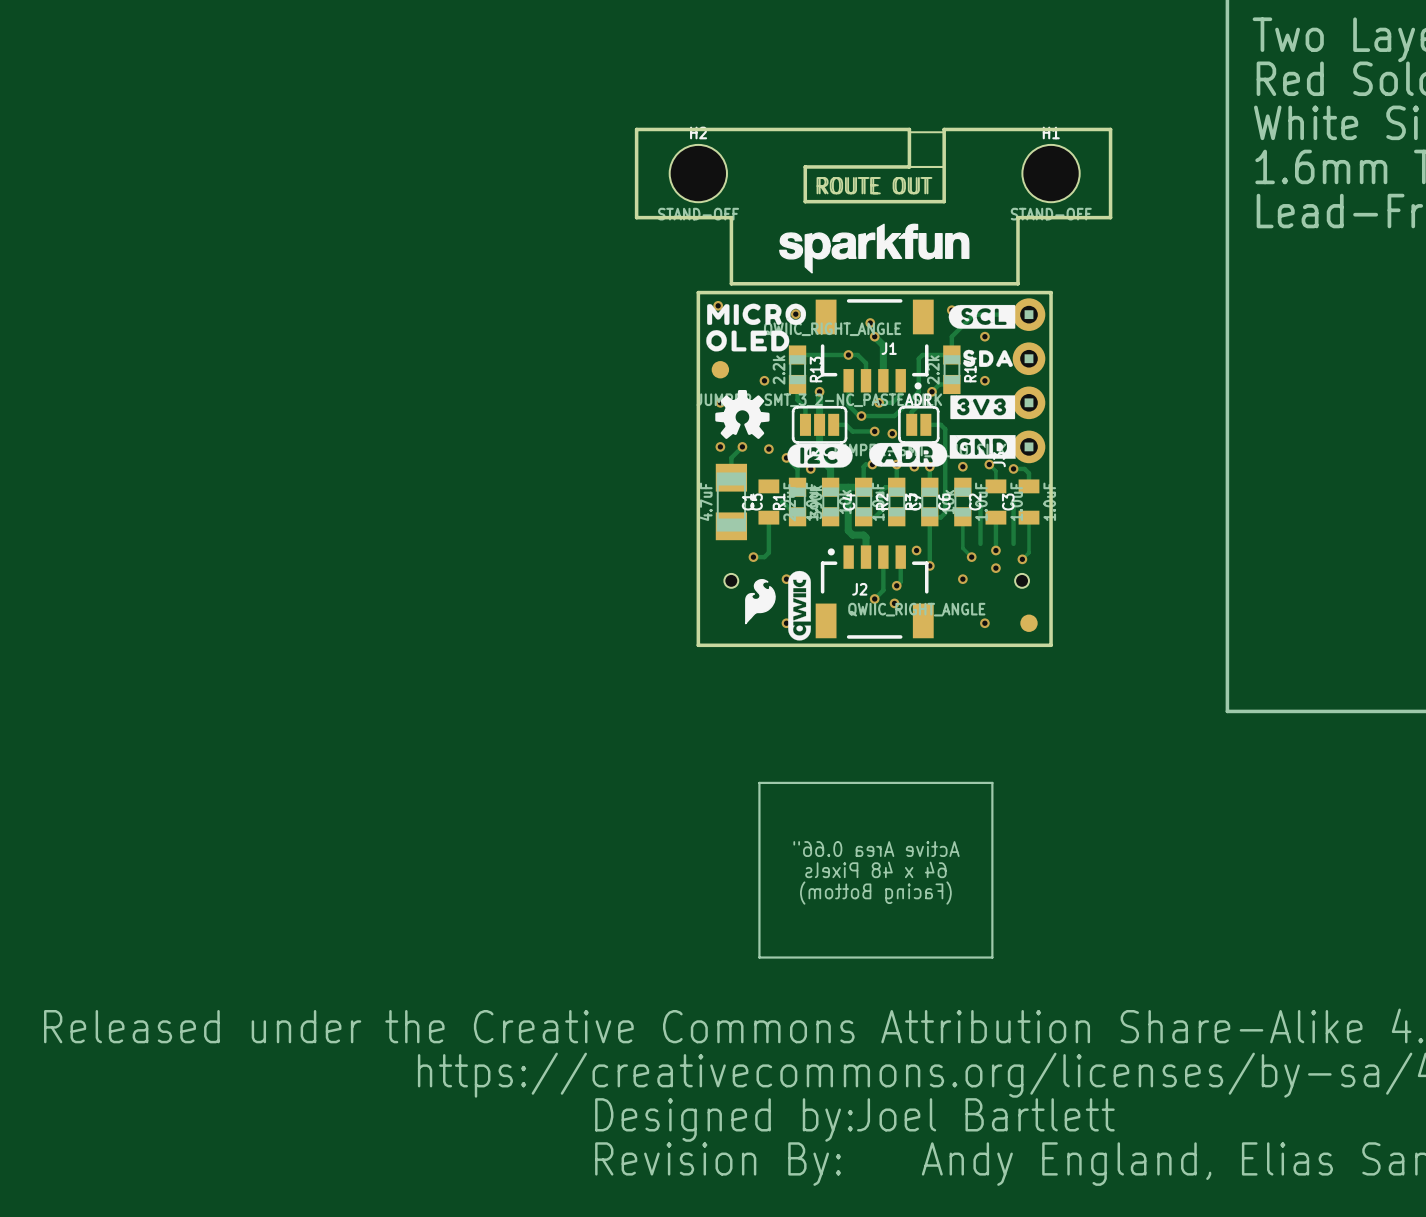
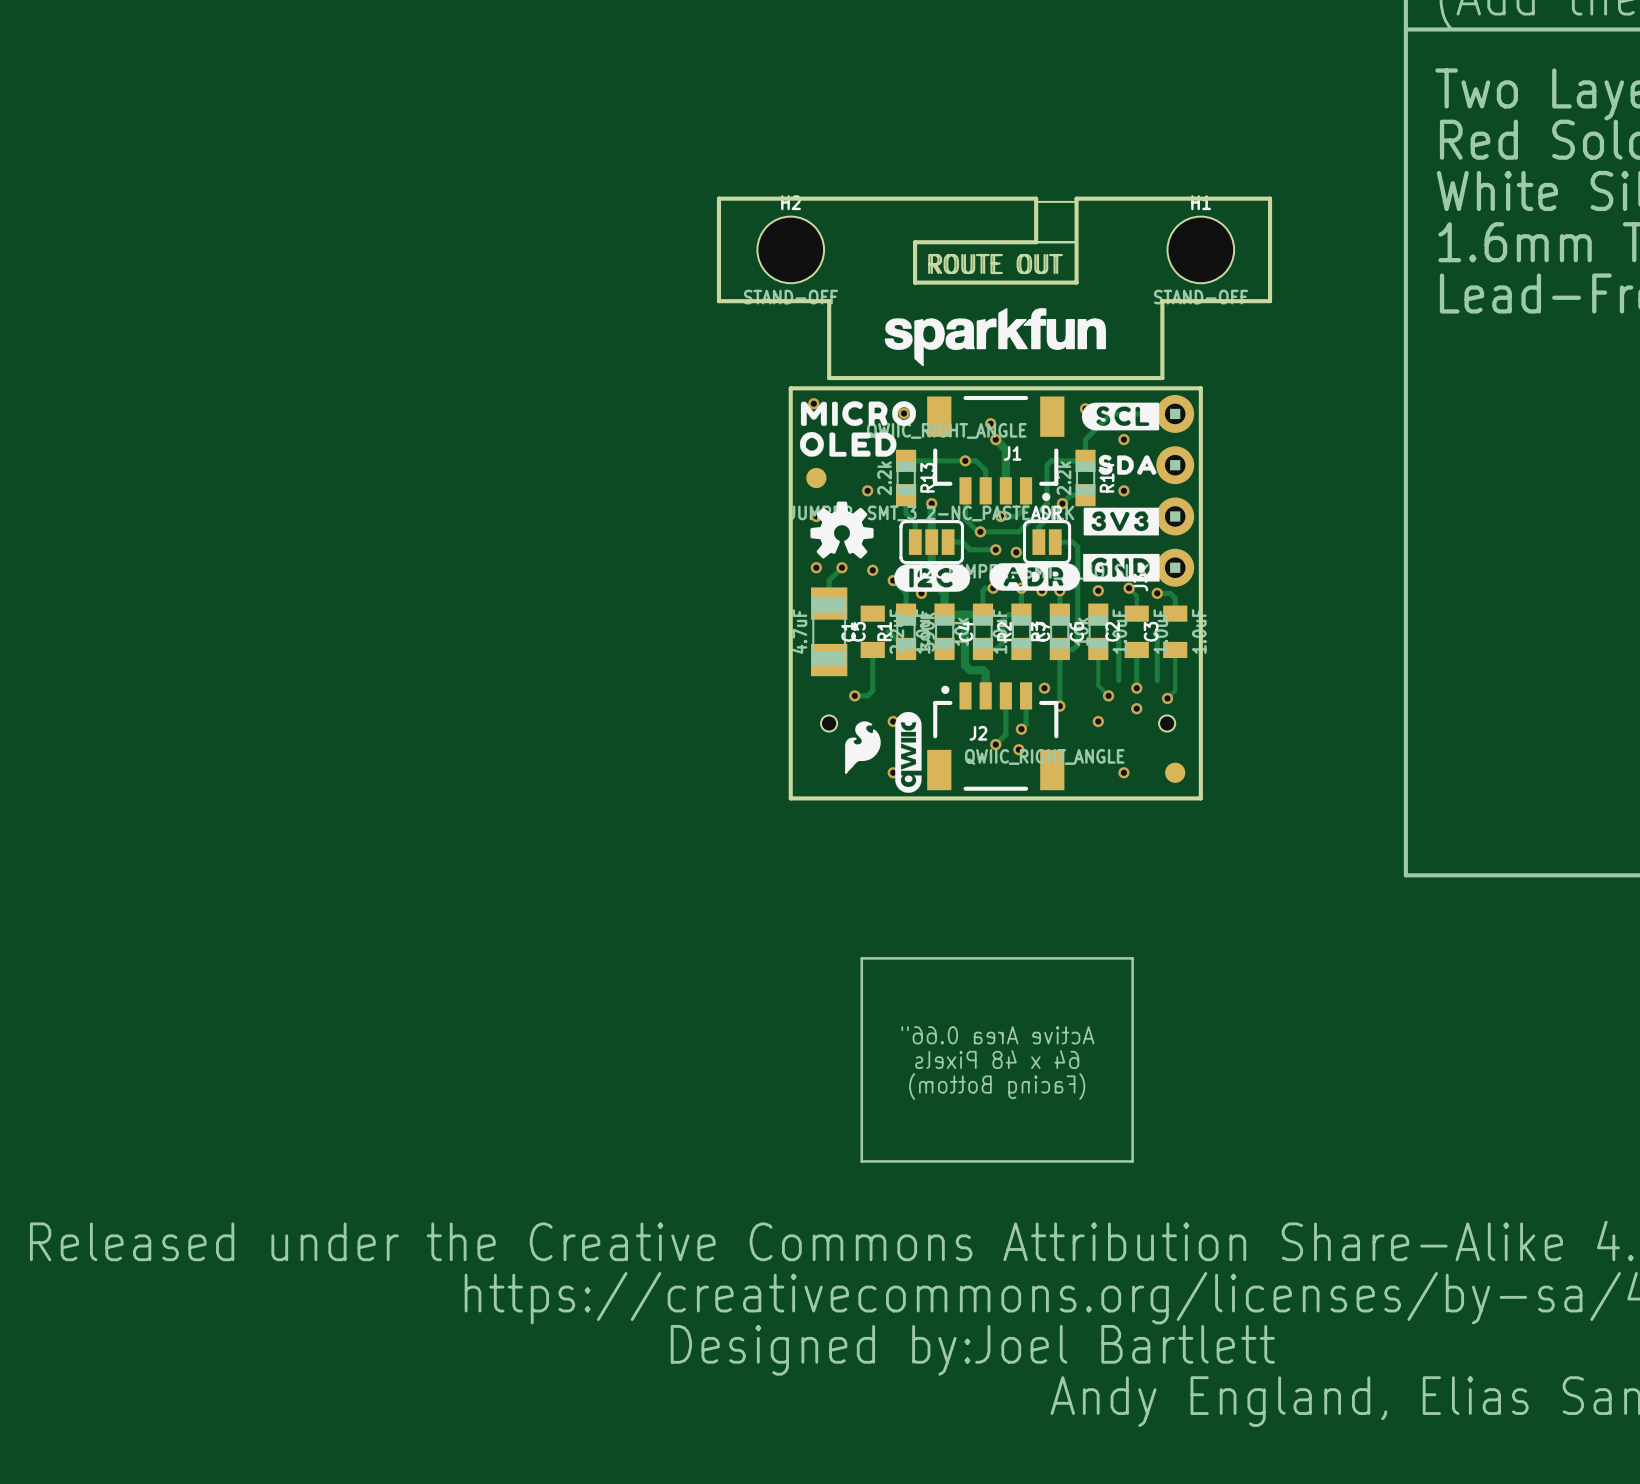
drawing: [595, 1142, 841, 1186] -> none

